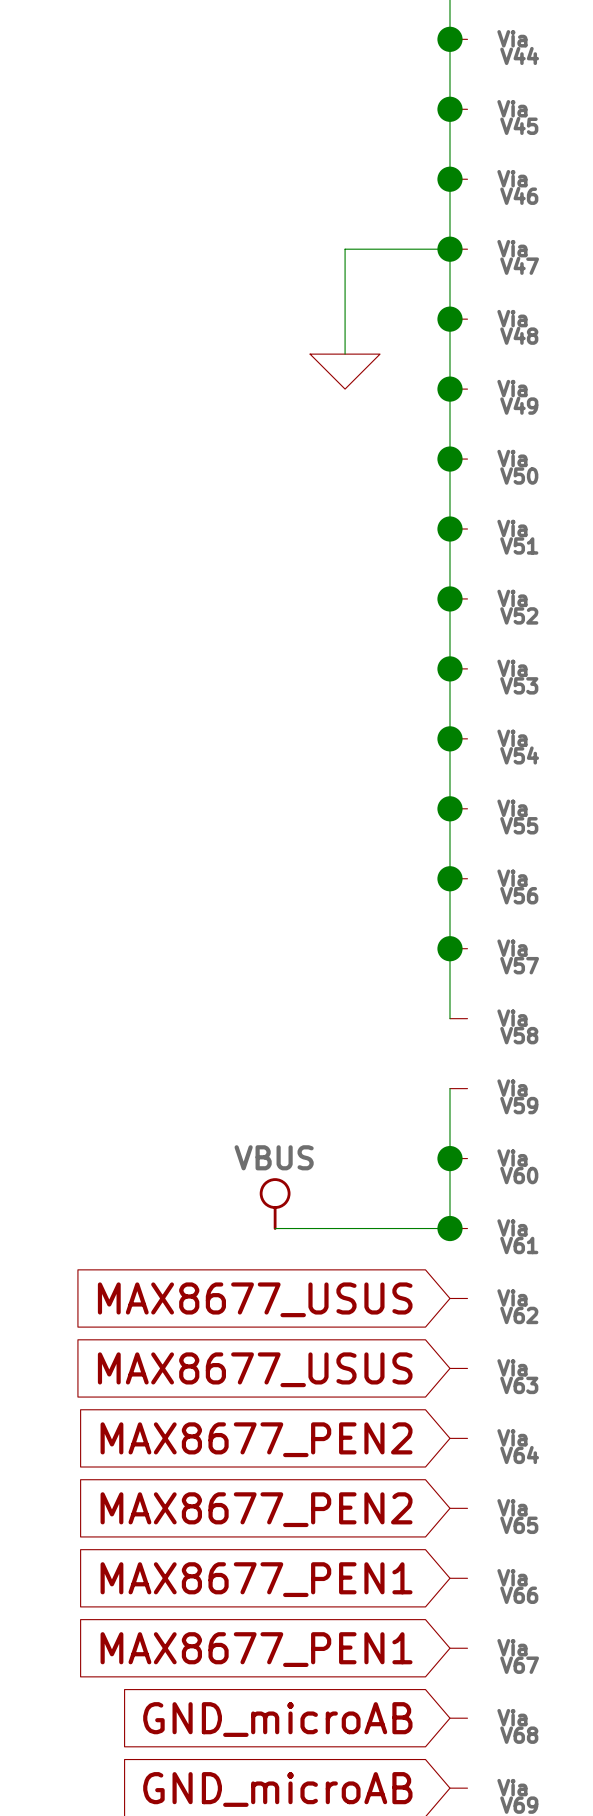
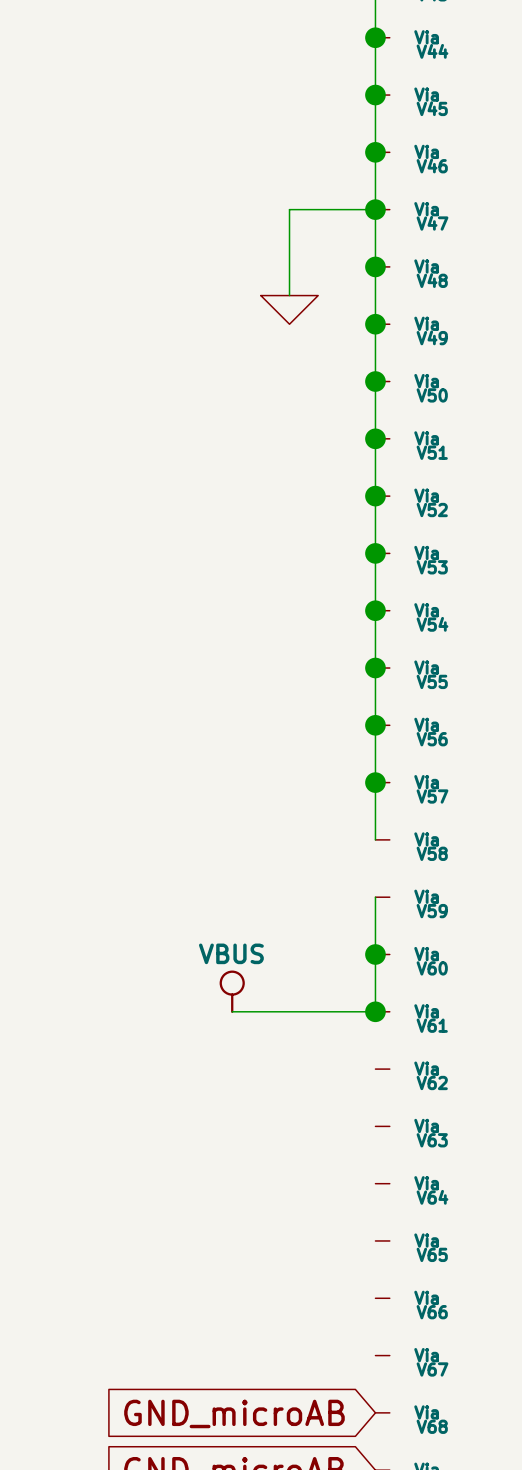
global label: MAX8677_USUS (255, 1299) -> none
global label: MAX8677_USUS (255, 1369) -> none
global label: MAX8677_PEN2 (256, 1439) -> none
global label: MAX8677_PEN2 (256, 1509) -> none
global label: MAX8677_PEN1 (256, 1579) -> none
global label: MAX8677_PEN1 (256, 1649) -> none

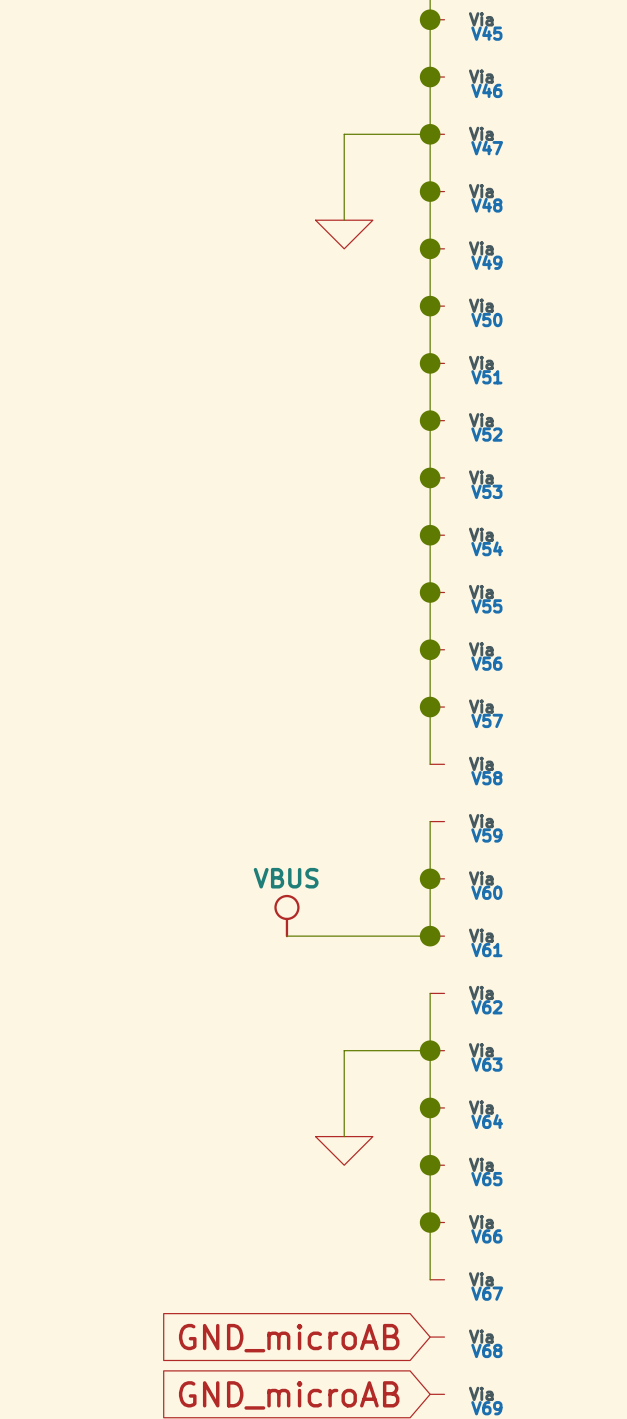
wire: none -> (430, 993) (430, 1279)
wire: none -> (430, 1050) (344, 1050) (344, 1136)
junction: none -> (430, 1050)
junction: none -> (430, 1107)
power symbol: none -> (344, 1150)
junction: none -> (430, 1165)
junction: none -> (430, 1222)

